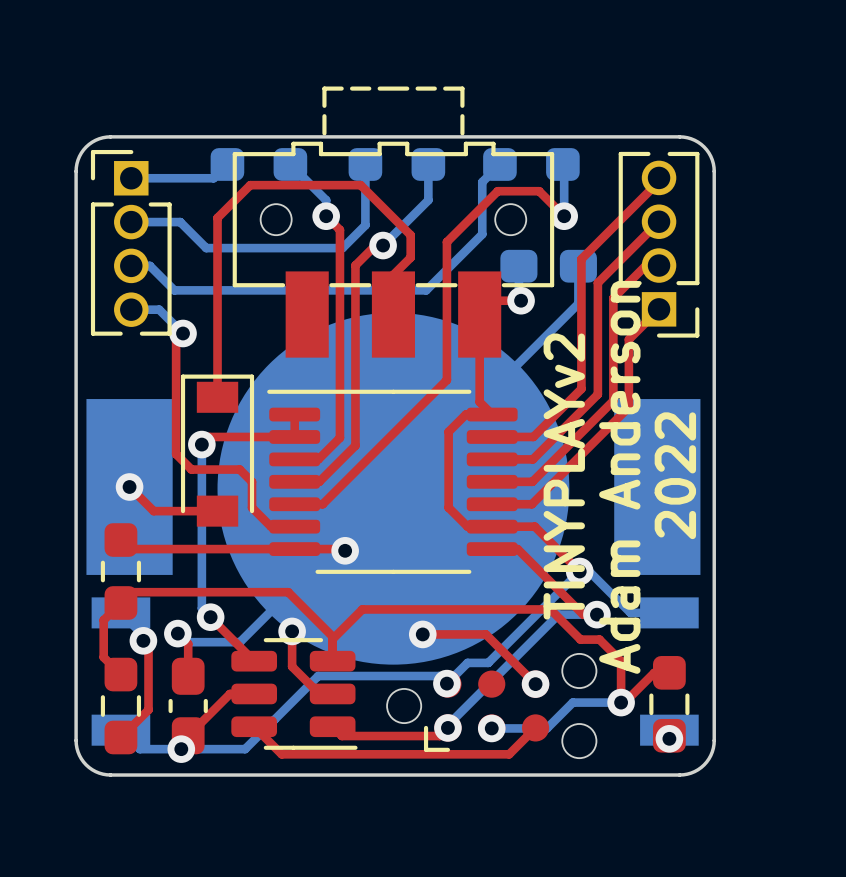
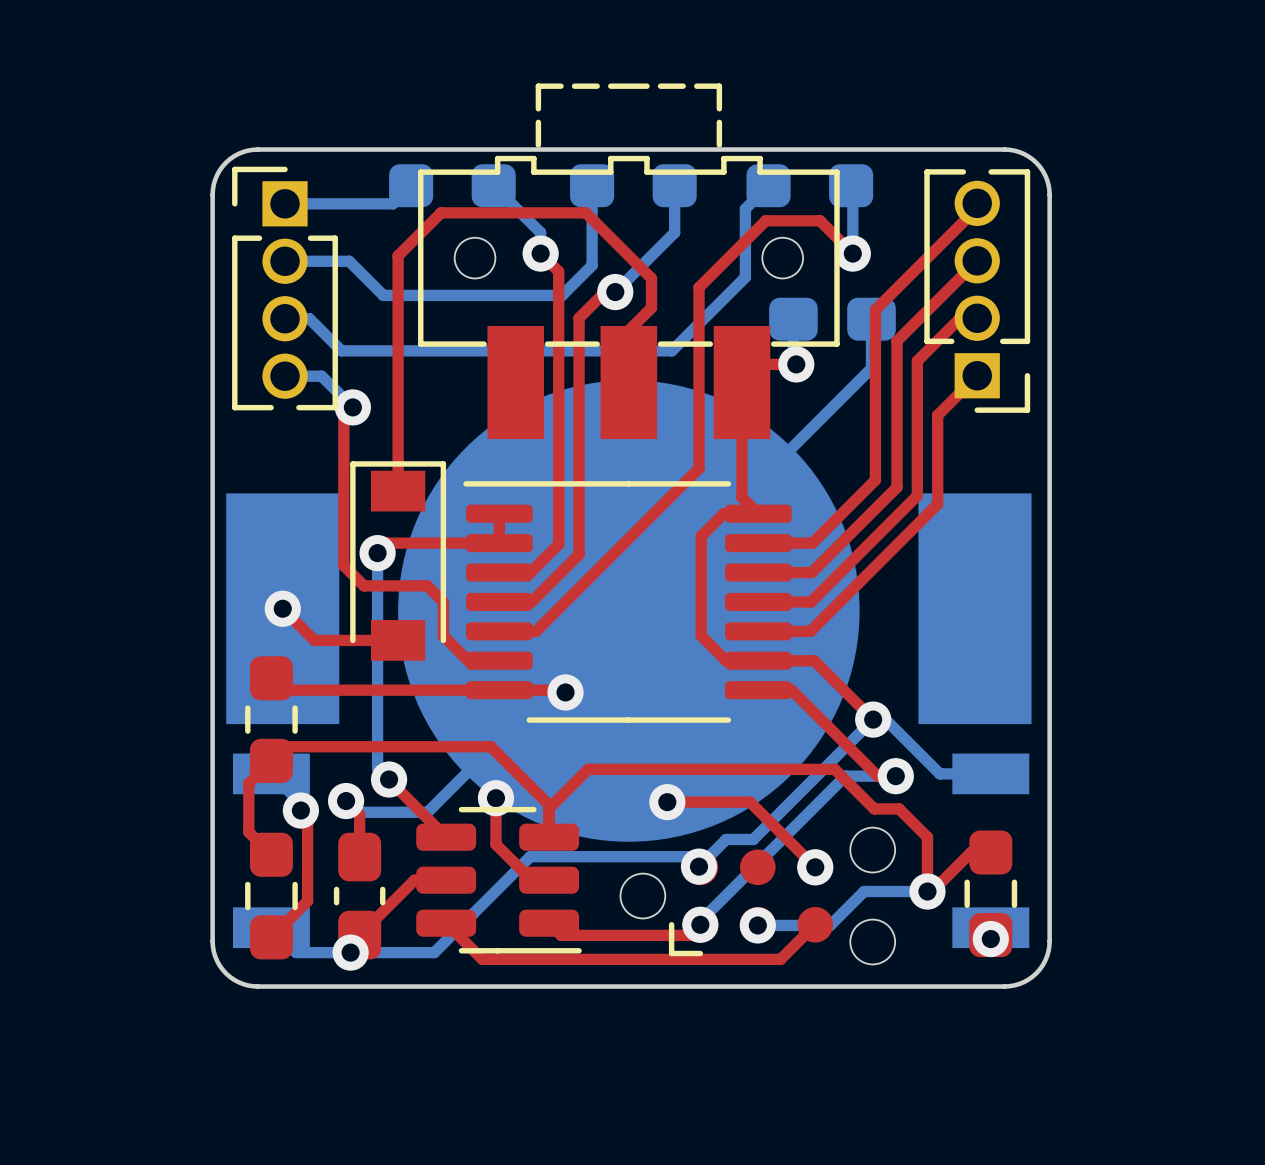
text: 2022 (675, 475) -> none
text: TINYPLAYv2 (564, 476) -> none
text: Adam Anderson (619, 477) -> none

